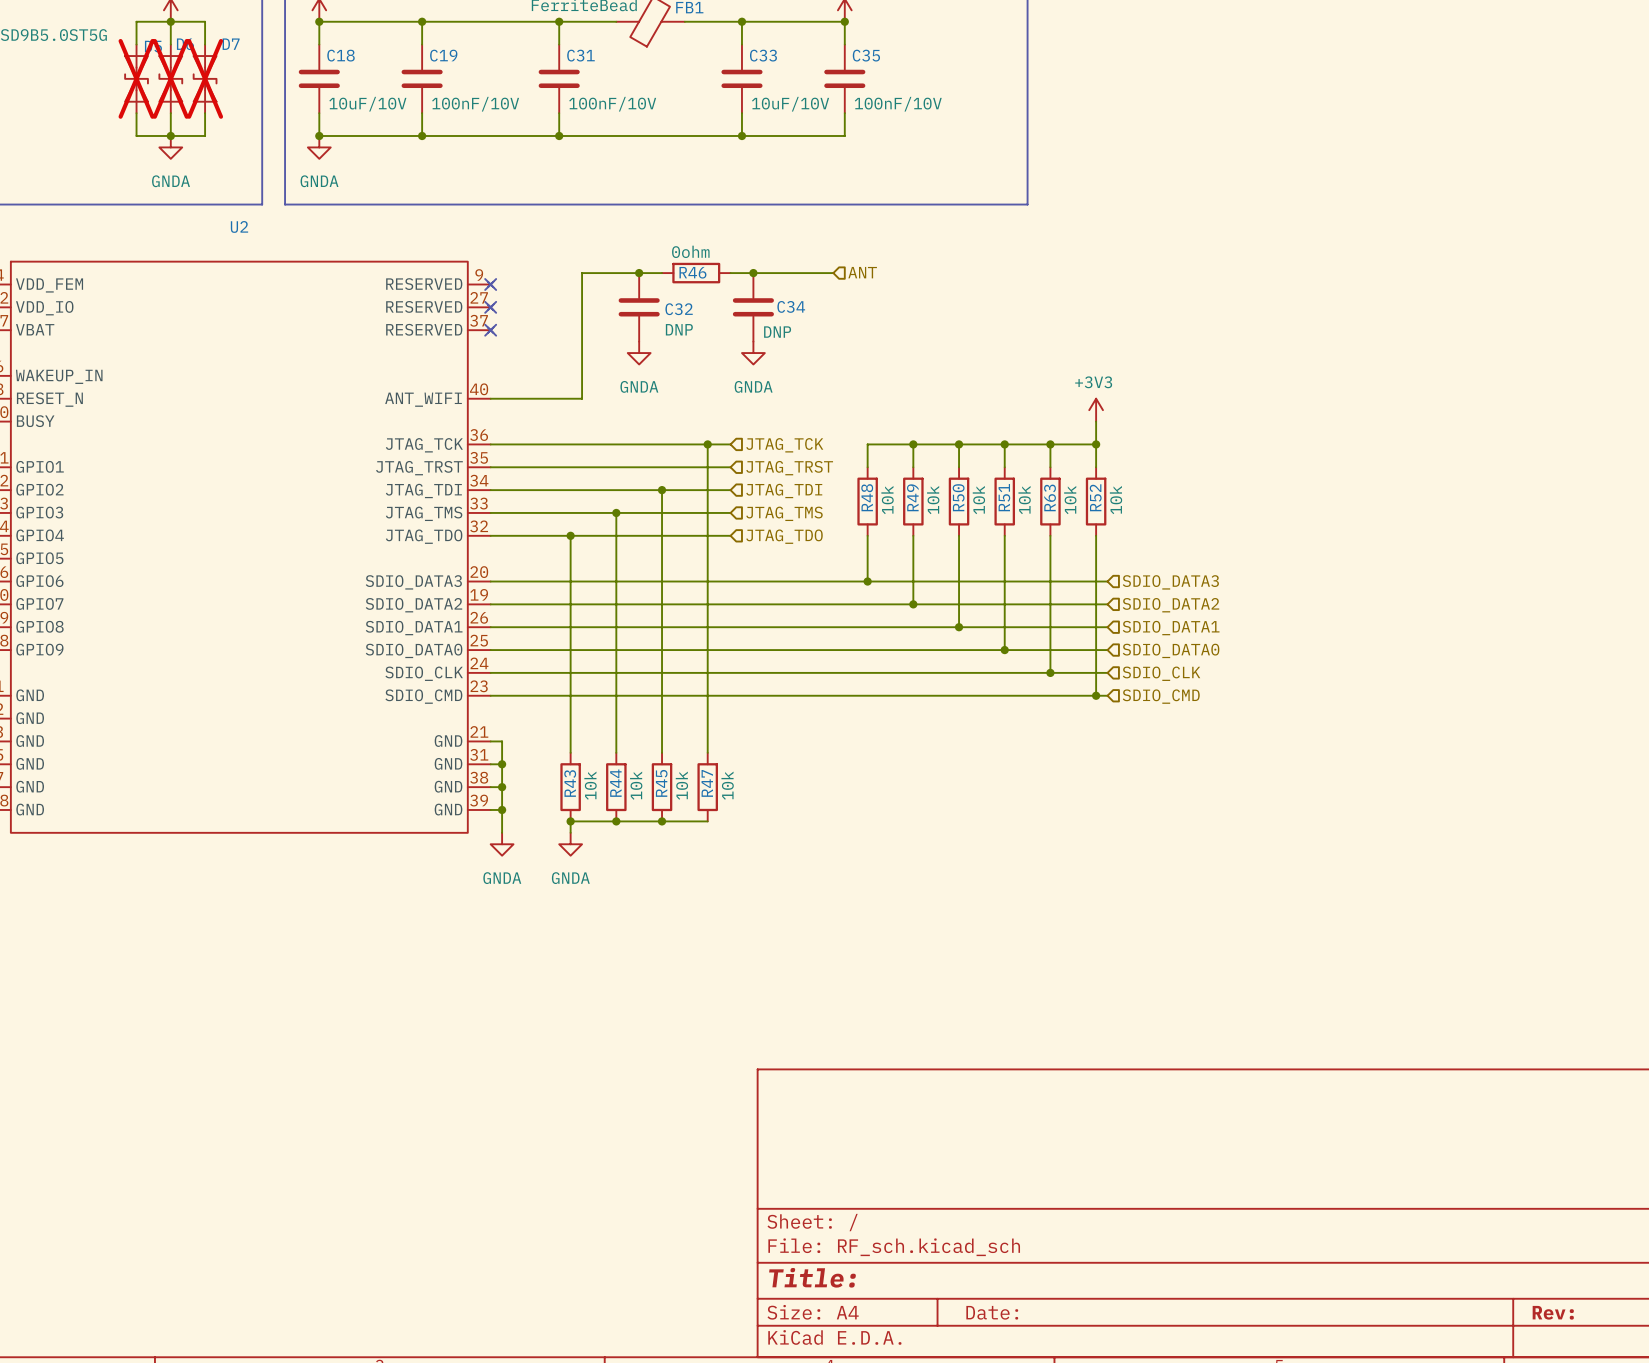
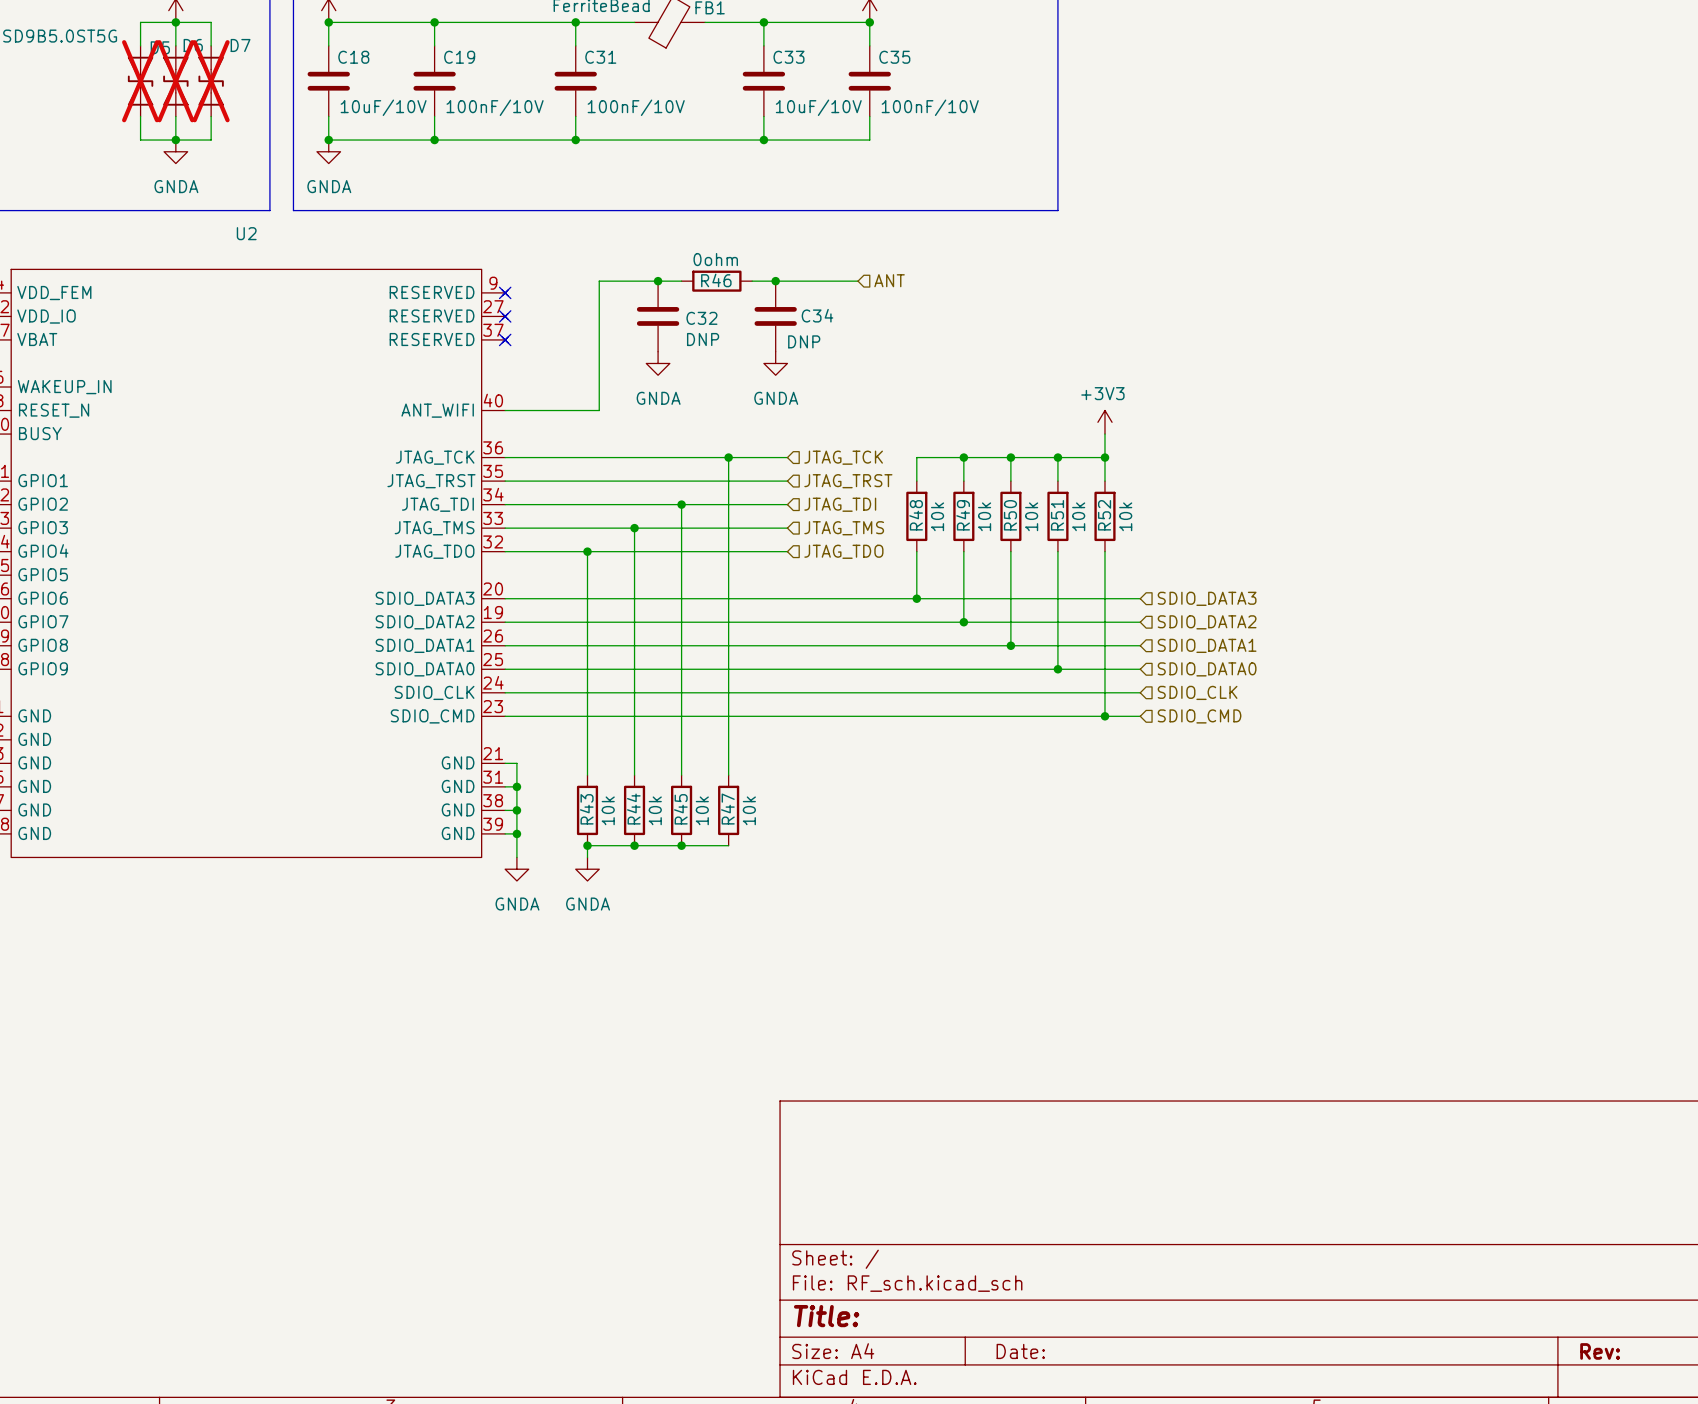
power symbol position: +3V3 (1096, 410) -> +3V3 (1104, 422)
wire: (1096, 421) (1096, 467) -> (1104, 434) (1104, 481)
wire: none -> (752, 457) (787, 457)
wire: (890, 444) (867, 444) (867, 467) -> (916, 457) (916, 481)
wire: (913, 444) (913, 467) -> (963, 457) (963, 481)
junction: (913, 444) -> none
junction: none -> (963, 457)
wire: (959, 444) (959, 467) -> (1010, 457) (1010, 481)
junction: (959, 444) -> none
junction: none -> (1010, 457)
wire: (1004, 444) (1004, 467) -> (1057, 457) (1057, 481)
junction: (1004, 444) -> none
junction: none -> (1057, 457)
wire: (1050, 444) (1050, 467) -> none
junction: (1050, 444) -> none
wire: (1073, 444) (1096, 444) -> none
junction: none -> (1104, 457)
junction: (1096, 444) -> none
hierarchical label position: JTAG_TCK (784, 445) -> JTAG_TCK (843, 457)
wire: none -> (752, 481) (787, 481)
hierarchical label position: JTAG_TRST (789, 468) -> JTAG_TRST (848, 481)
wire: none -> (752, 504) (787, 504)
hierarchical label position: JTAG_TDI (784, 490) -> JTAG_TDI (840, 504)
R48 position: (867, 501) -> (916, 516)
R49 position: (913, 501) -> (963, 516)
R50 position: (959, 501) -> (1010, 516)
R51 position: (1004, 501) -> (1057, 516)
R63: 10k (1050, 501) -> none
R52 position: (1096, 501) -> (1104, 516)
wire: none -> (752, 528) (787, 528)
hierarchical label position: JTAG_TMS (784, 513) -> JTAG_TMS (844, 528)
wire: none -> (752, 551) (787, 551)
wire: (867, 535) (867, 581) -> (916, 551) (916, 598)
wire: (913, 535) (913, 604) -> (963, 551) (963, 622)
wire: (959, 535) (959, 627) -> (1010, 551) (1010, 645)
wire: (1004, 535) (1004, 650) -> (1057, 551) (1057, 669)
wire: (1050, 535) (1050, 672) -> none
wire: (1096, 535) (1096, 695) -> (1104, 551) (1104, 716)
hierarchical label position: JTAG_TDO (784, 536) -> JTAG_TDO (843, 551)
junction: (867, 581) -> none
junction: none -> (916, 598)
junction: (913, 604) -> none
junction: none -> (963, 622)
junction: (959, 627) -> none
junction: none -> (1010, 645)
junction: (1004, 650) -> none
junction: none -> (1057, 669)
junction: (1050, 672) -> none
junction: none -> (1104, 716)
junction: (1096, 695) -> none

